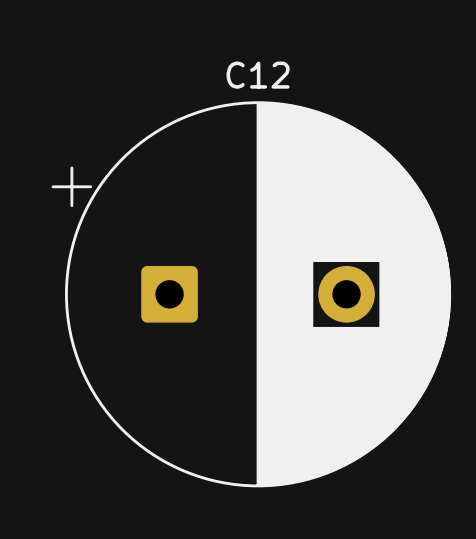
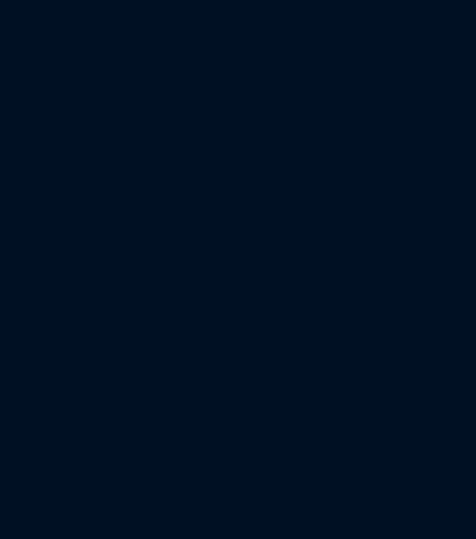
C12: (251, 294) -> none

